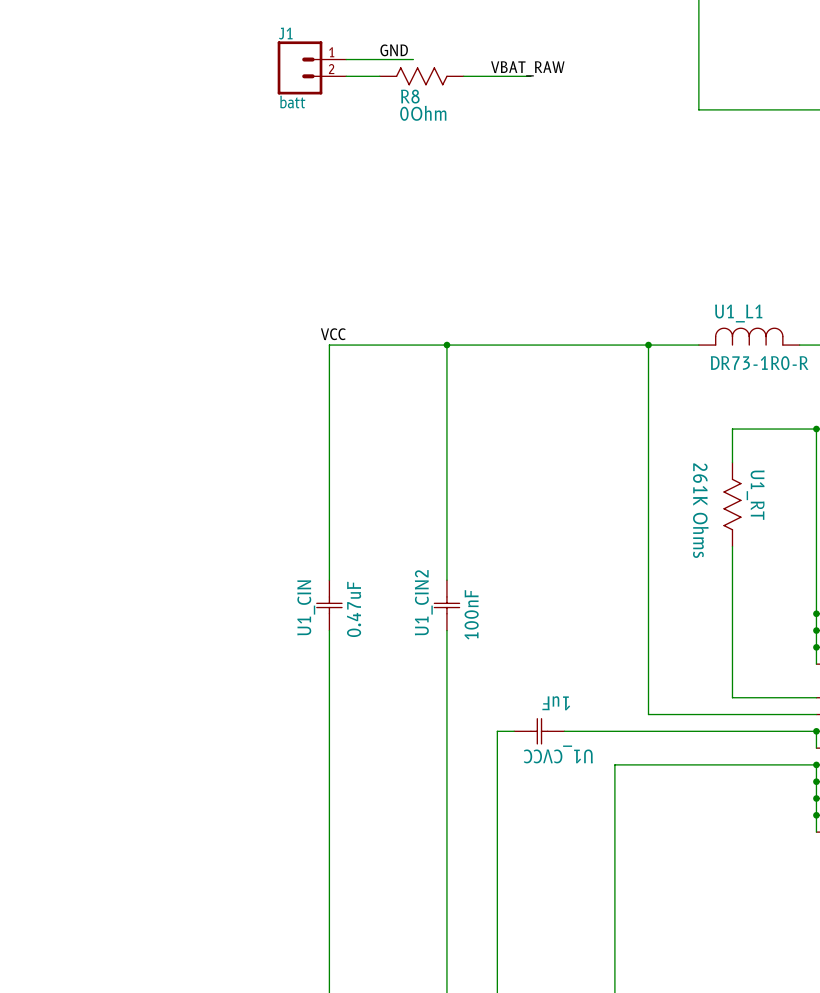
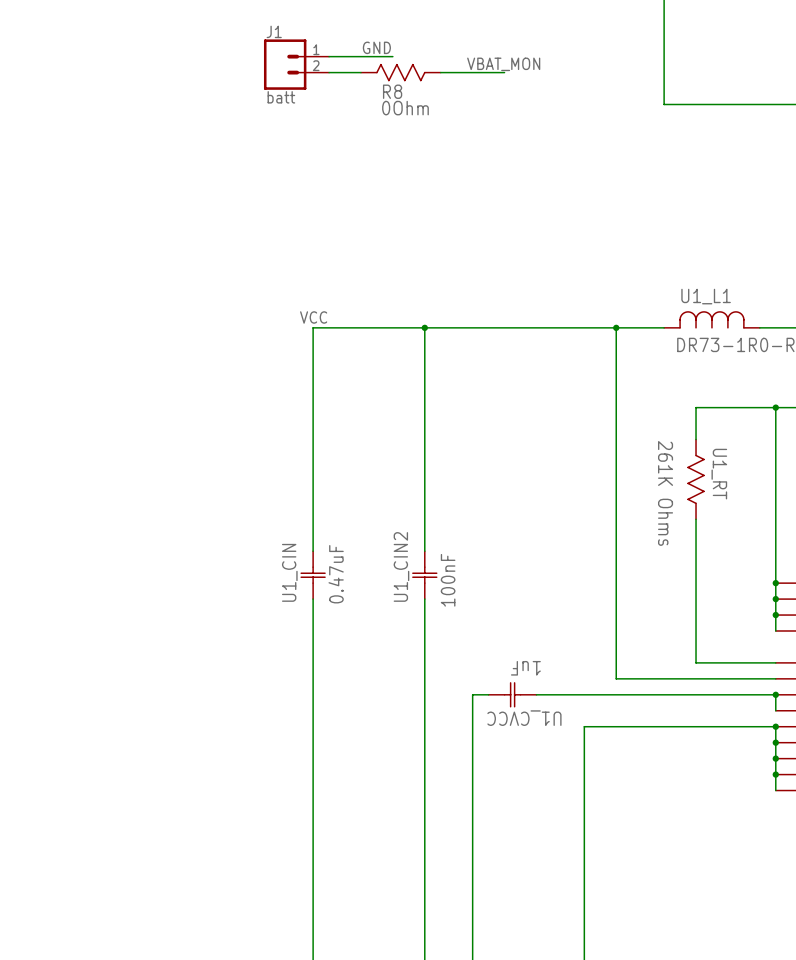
label: VBAT_RAW (527, 68) -> VBAT_MON (503, 64)

